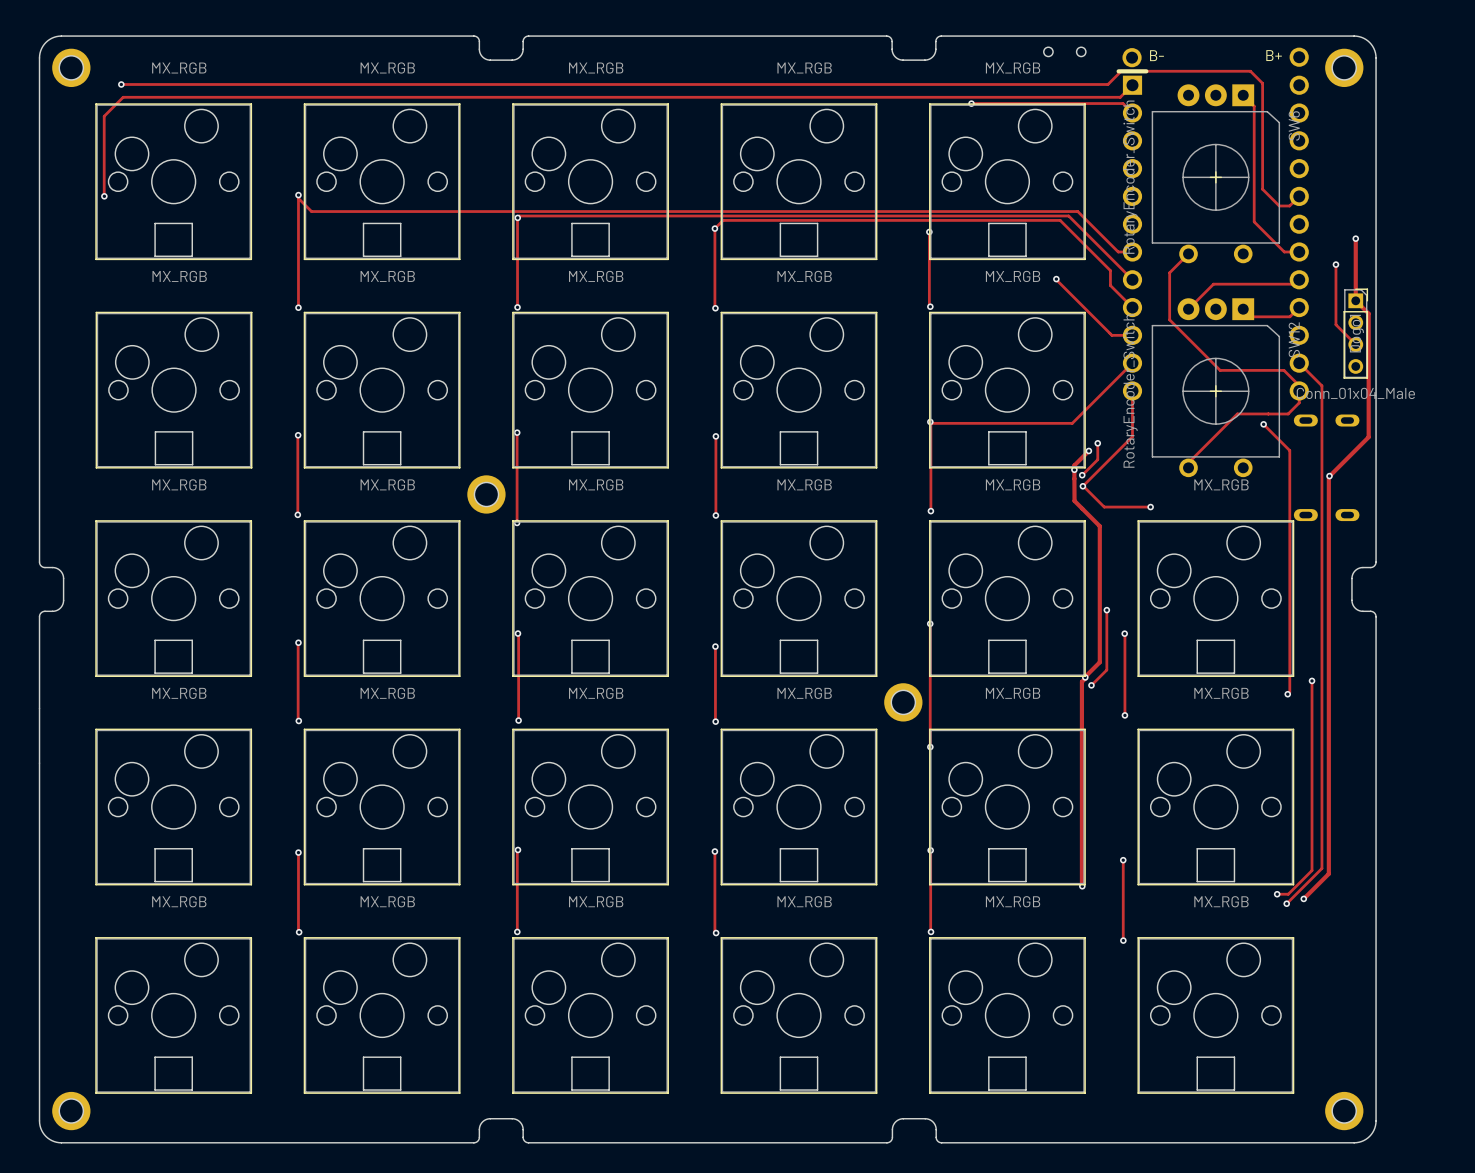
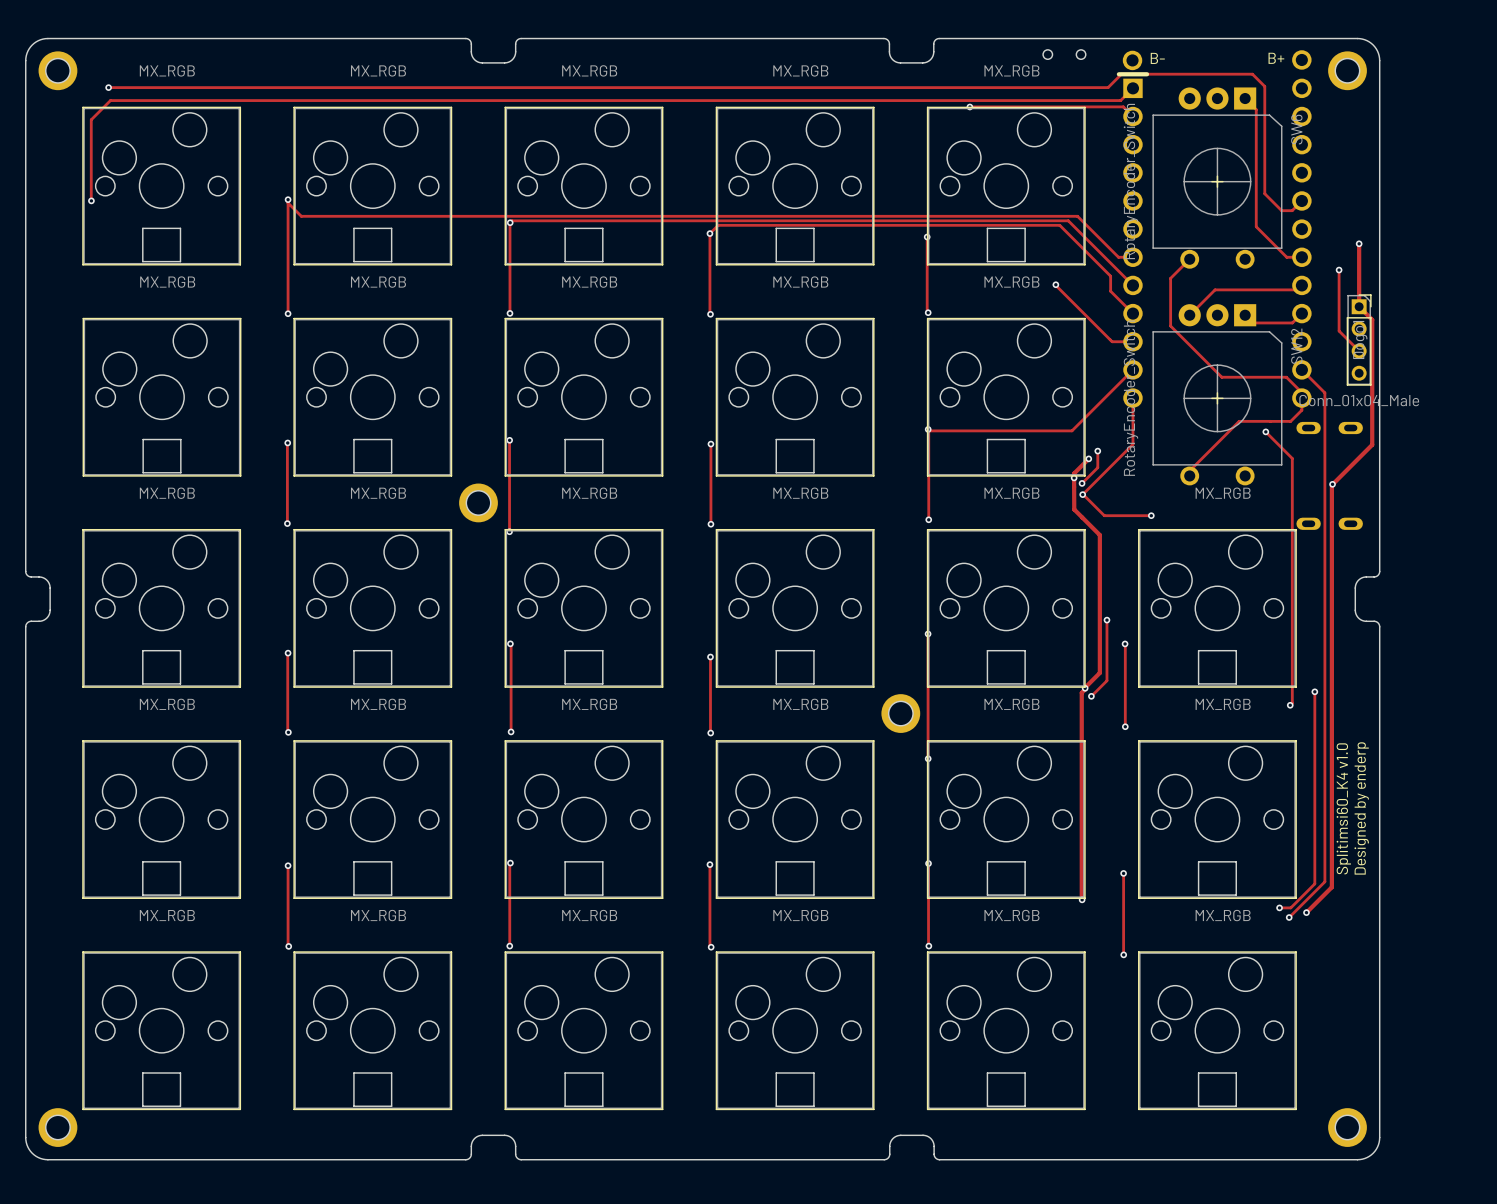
text: none -> Splitimsi60_K4 v1.0 (1343, 808)
text: none -> Designed by enderp (1361, 808)

